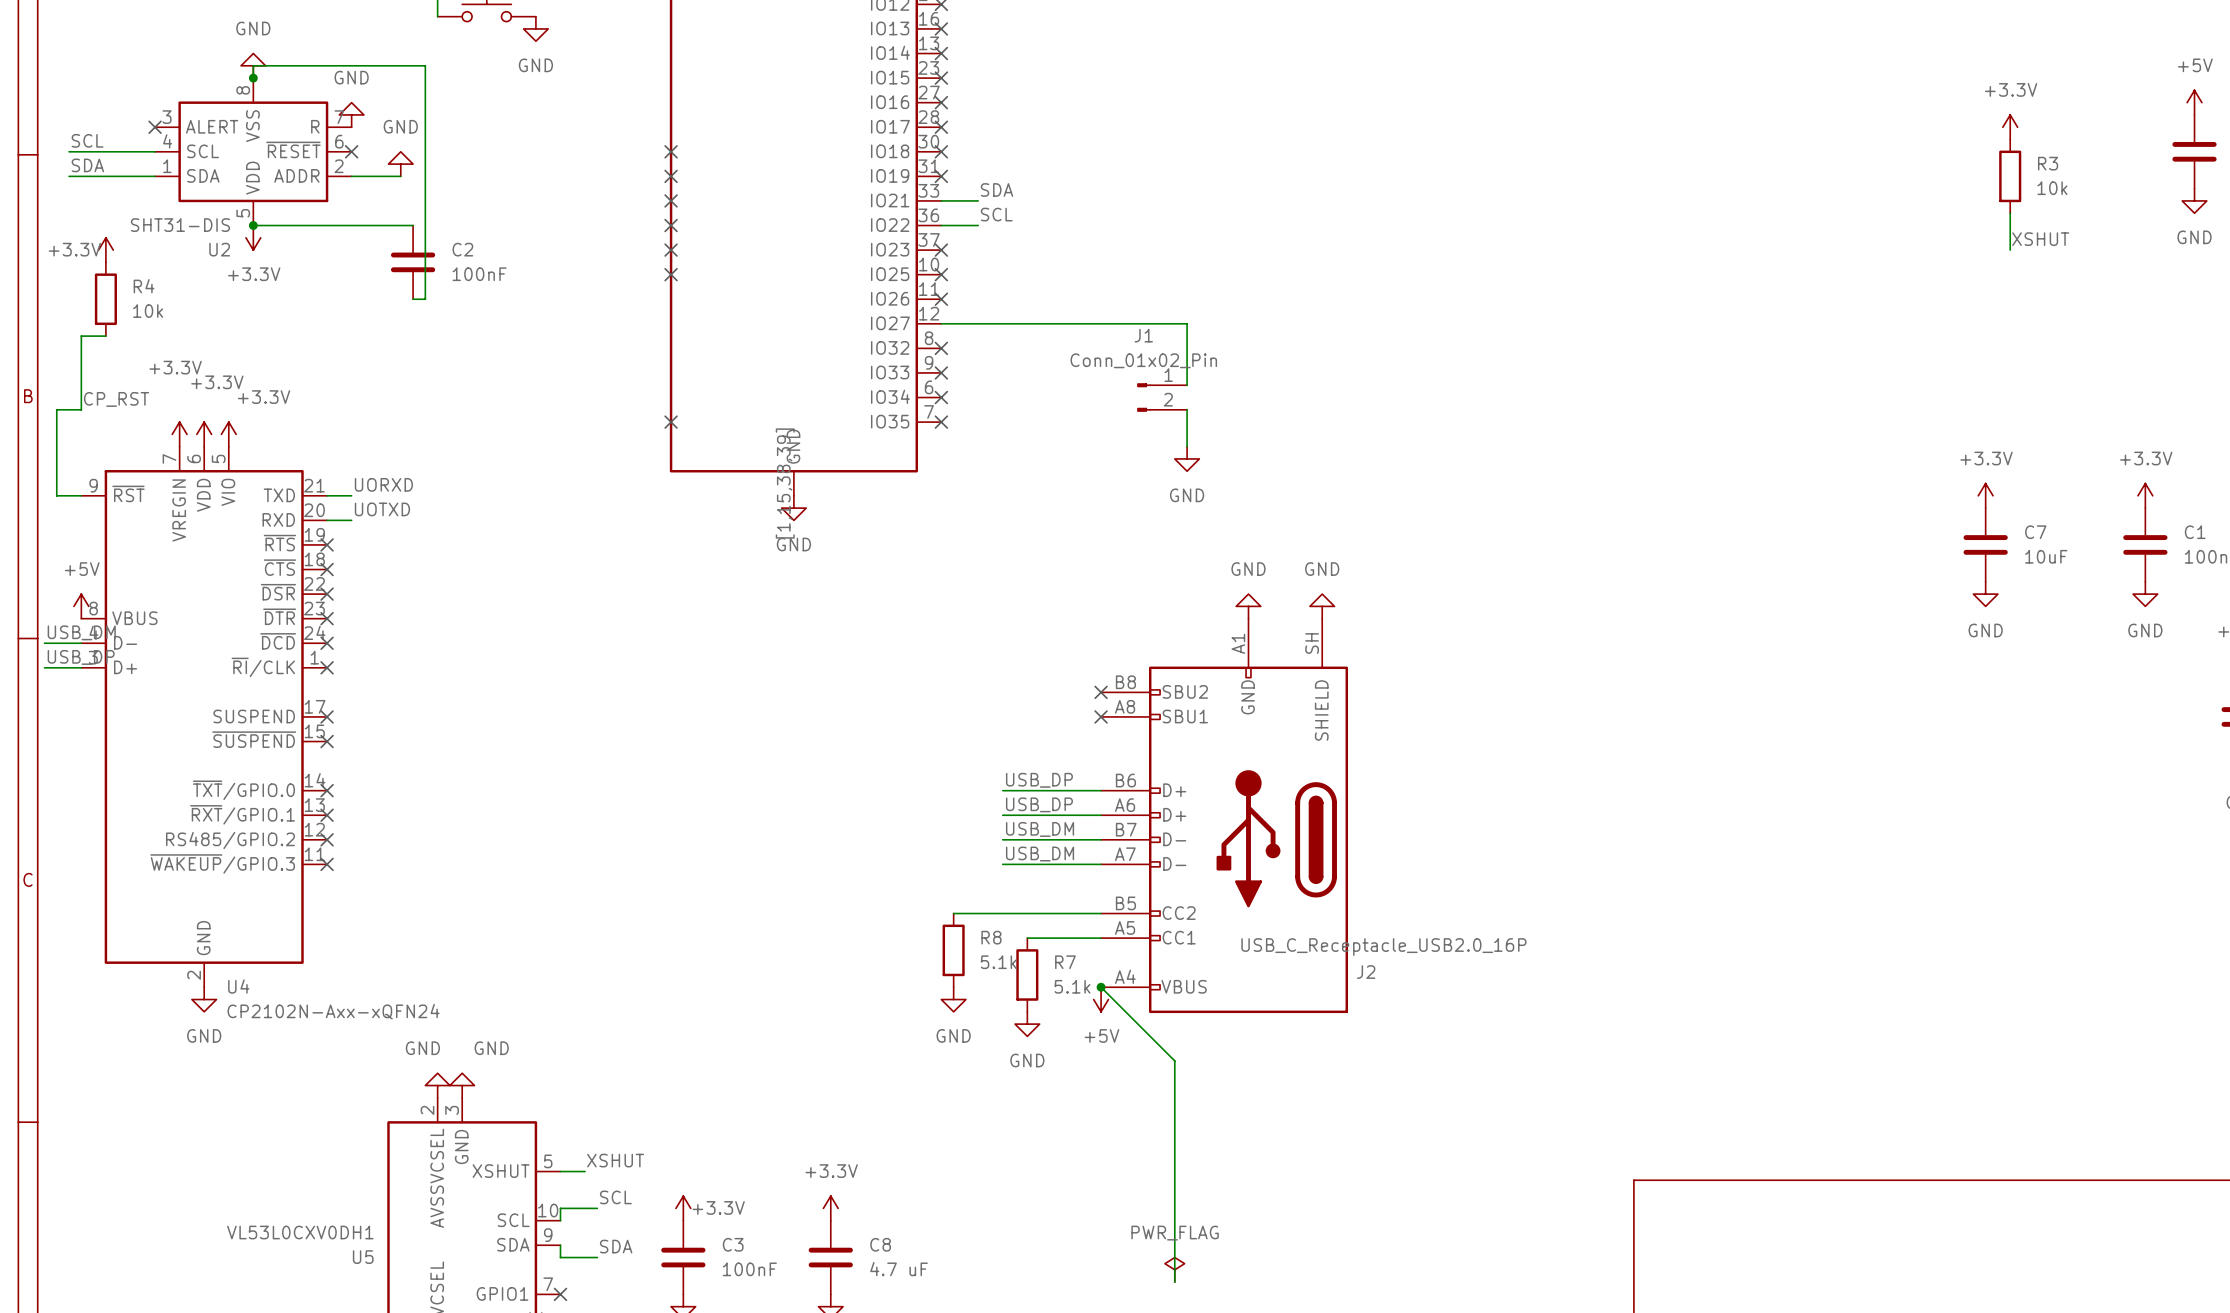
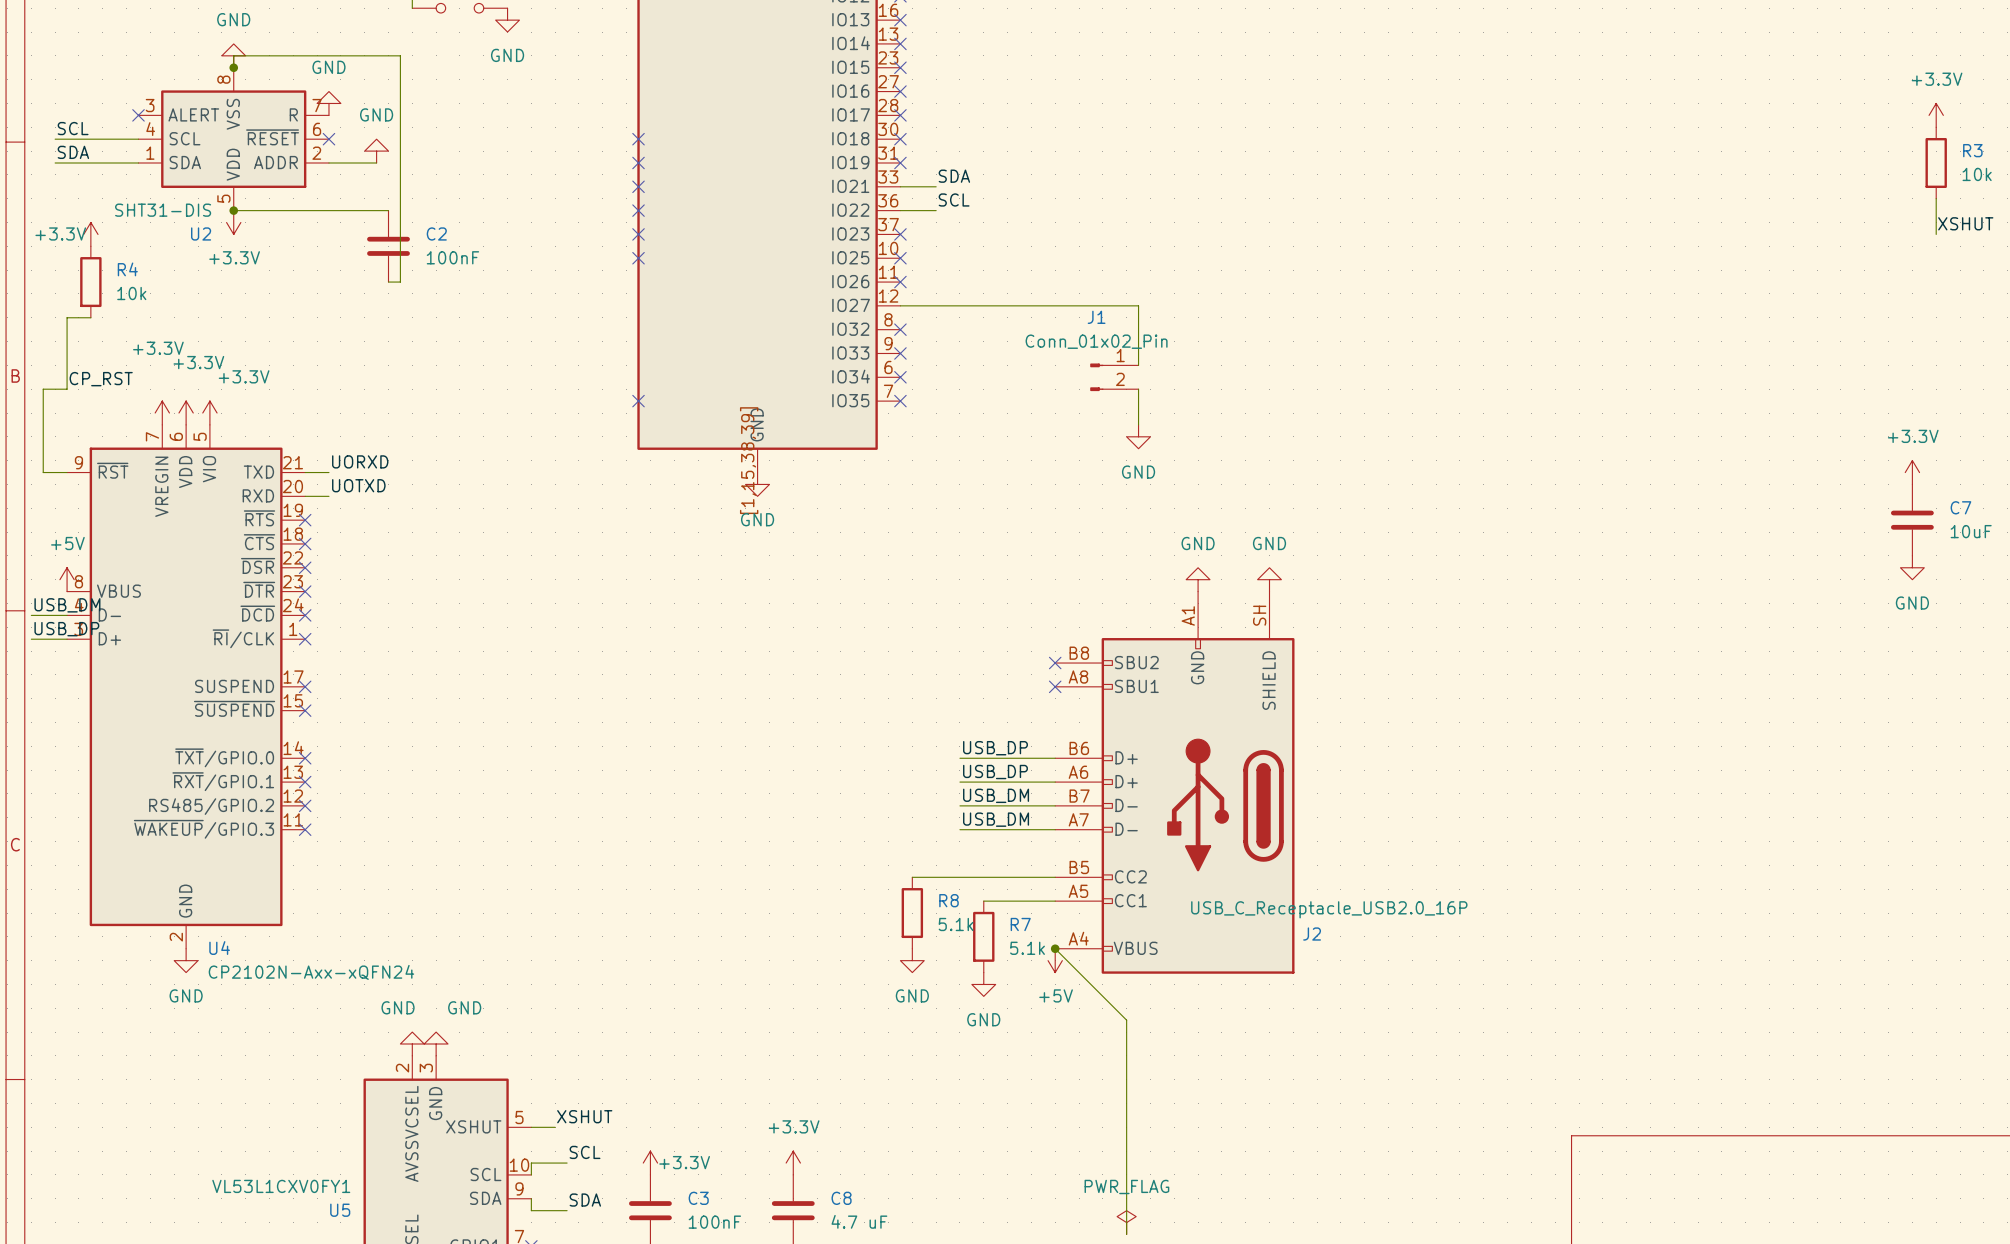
U5 value: VL53L0CXV0DH1 (300, 1232) -> VL53L1CXV0FY1 (281, 1186)

